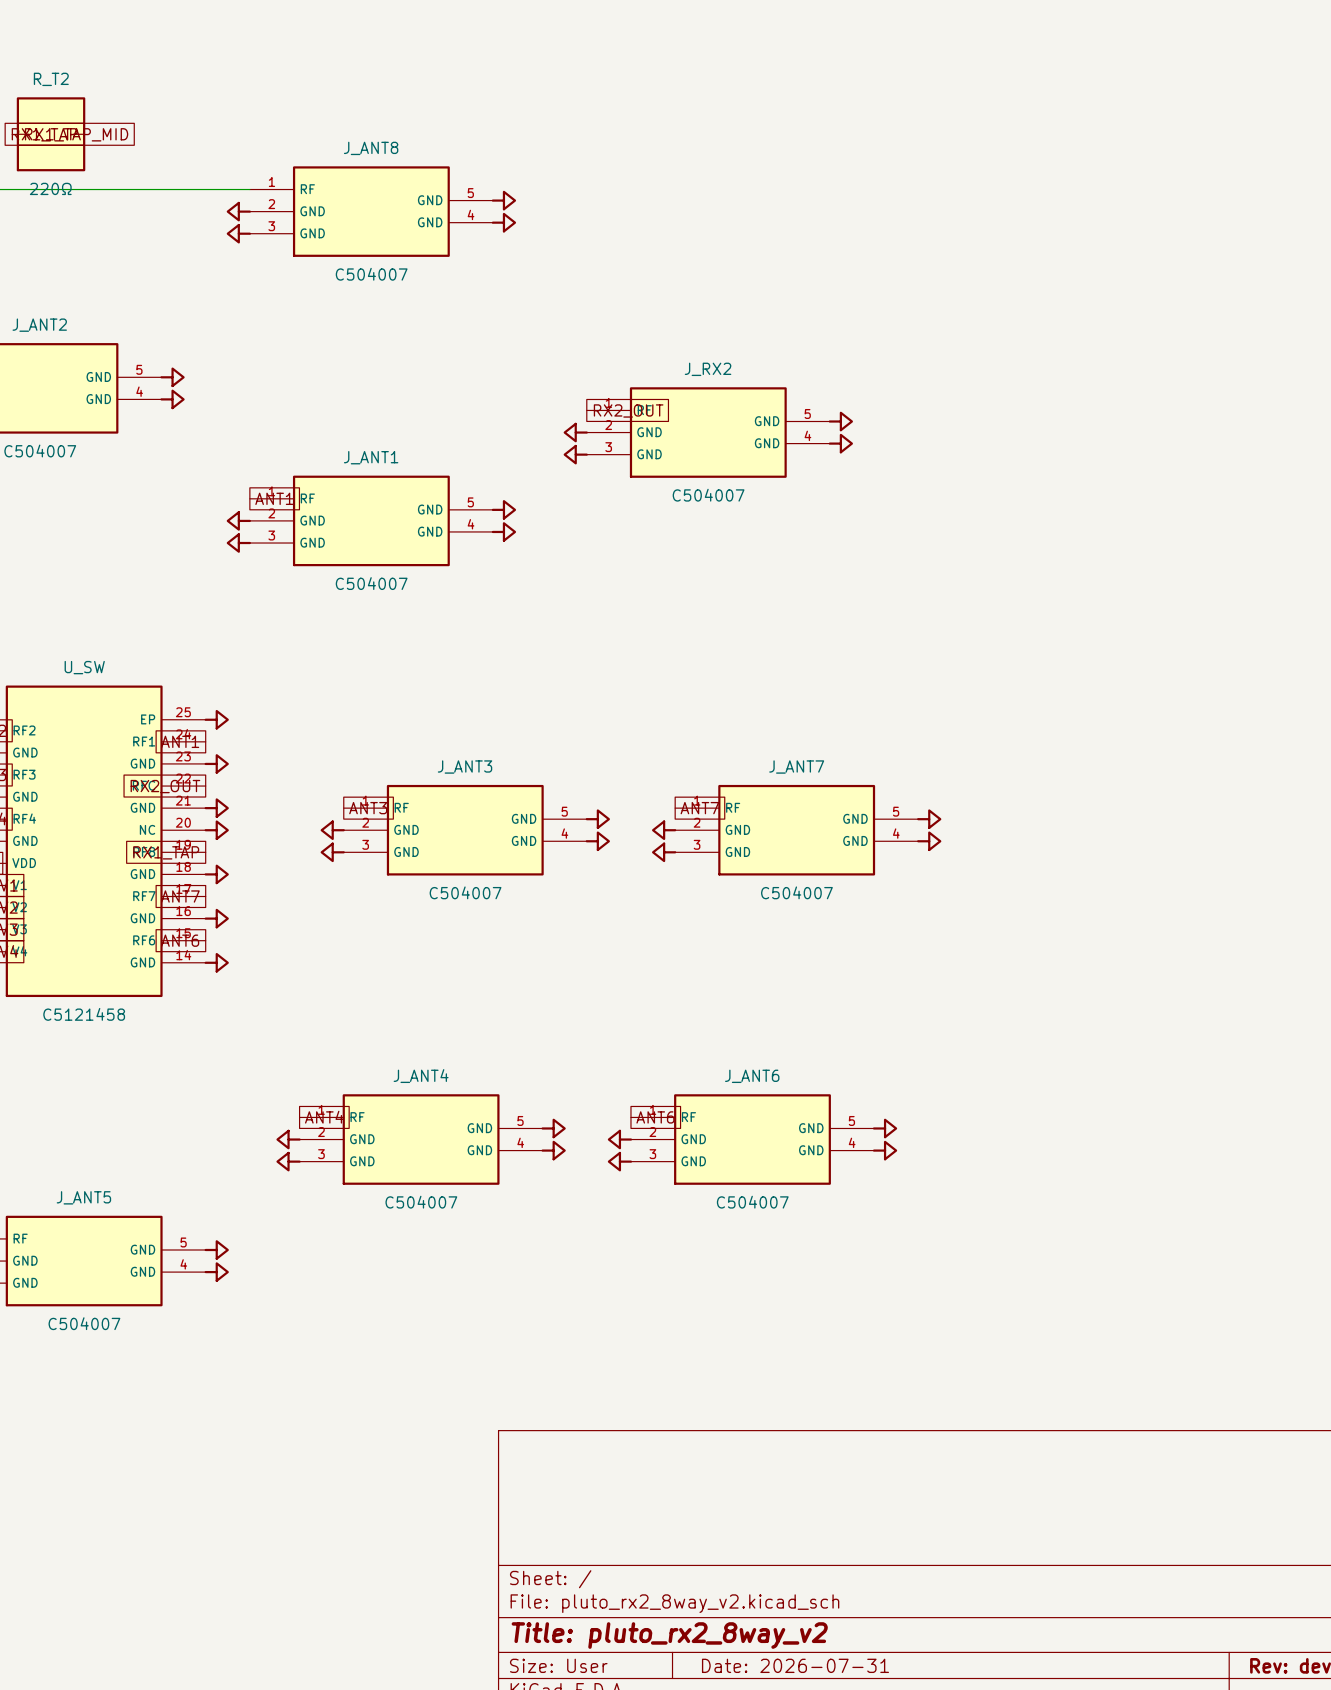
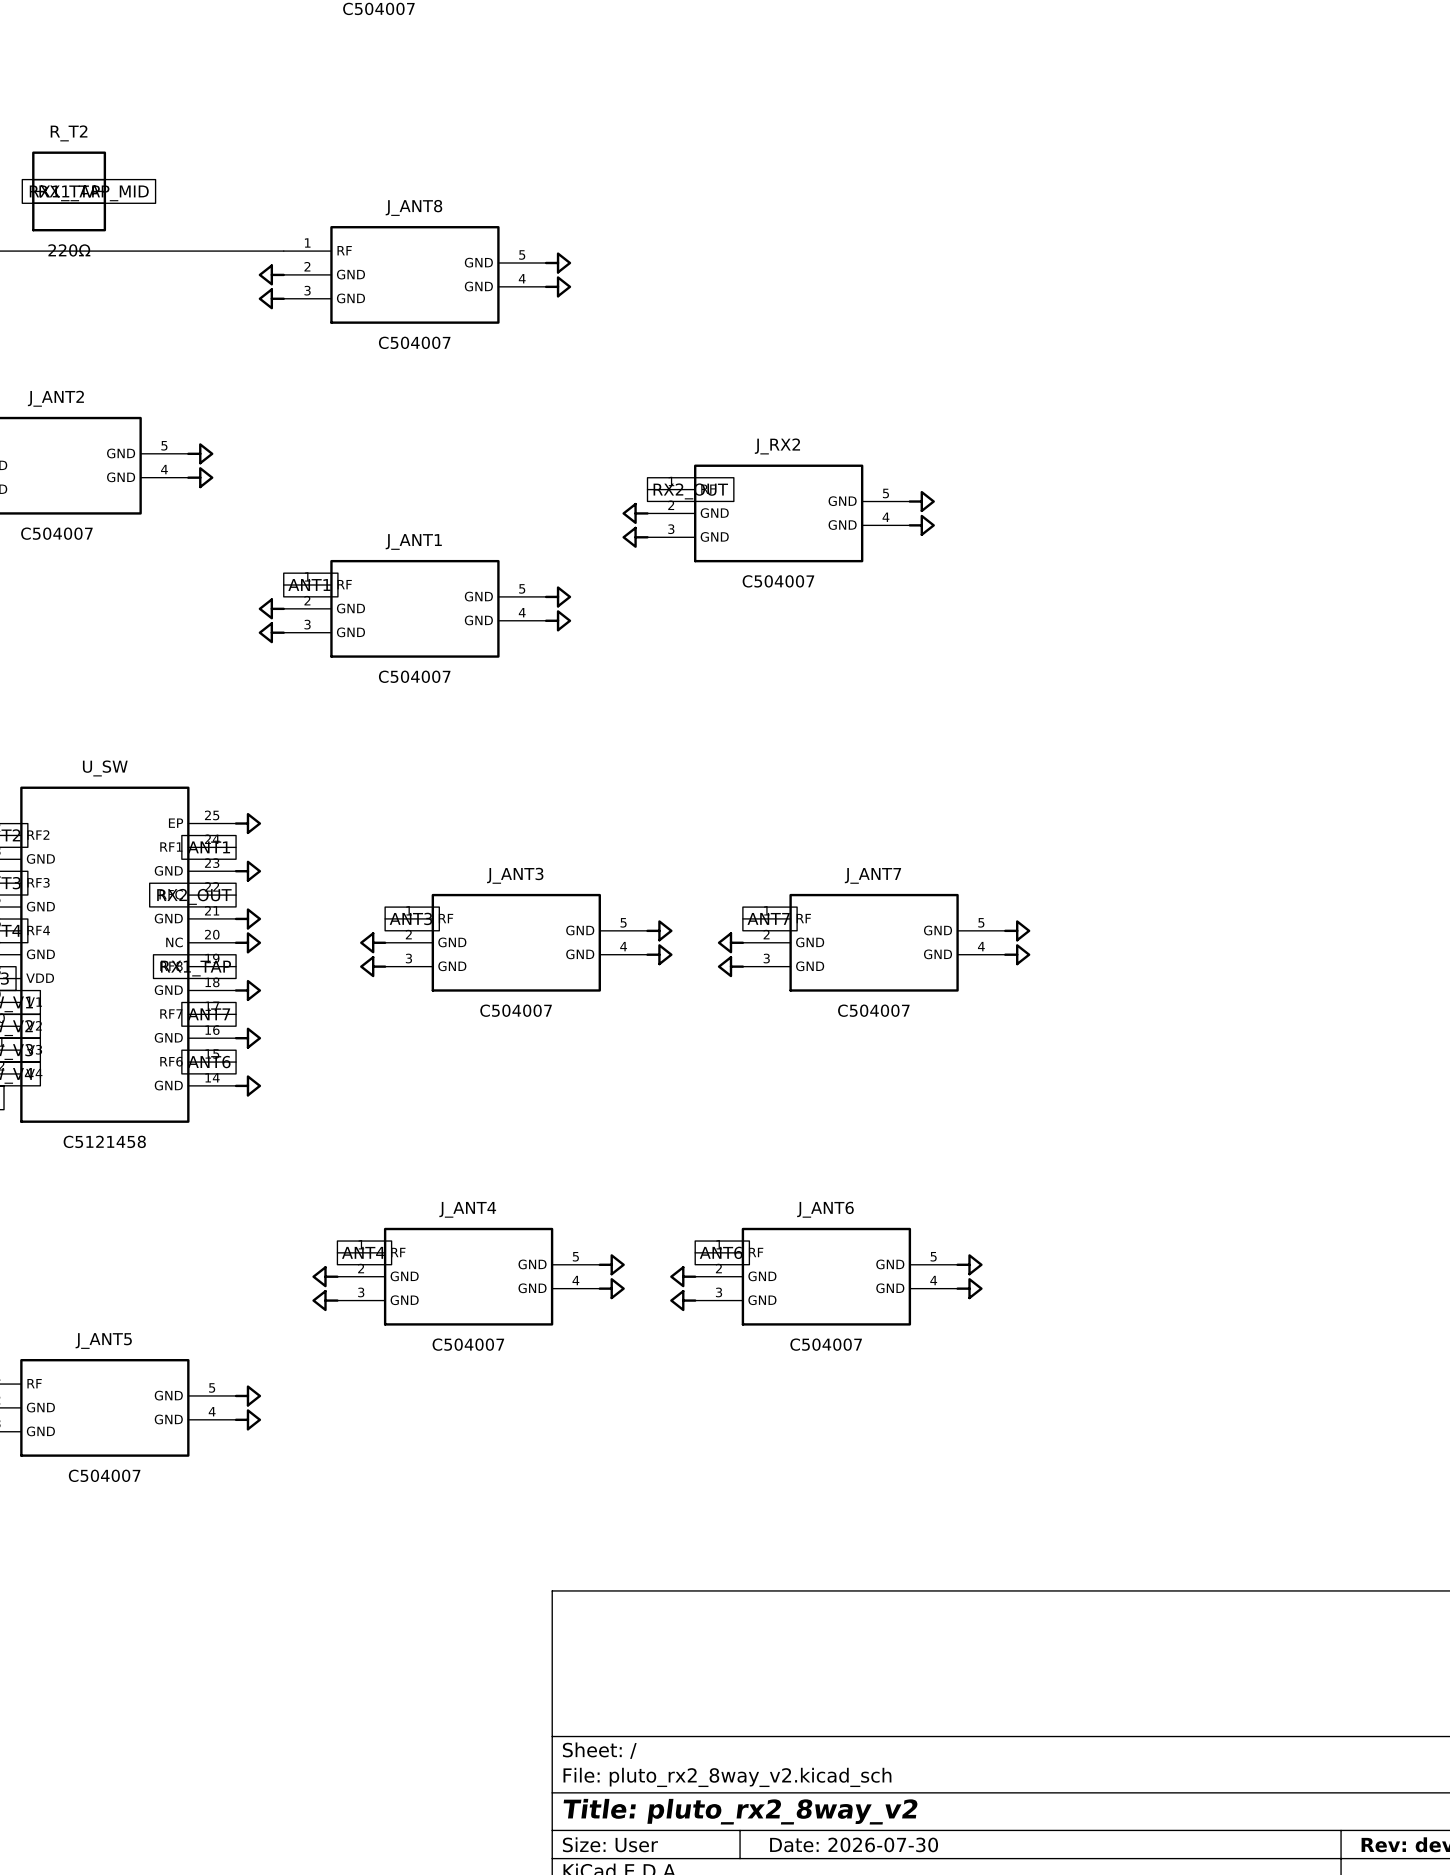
title block: Date: 2026-07-31 (795, 1665) -> Date: 2026-07-30 (854, 1844)

